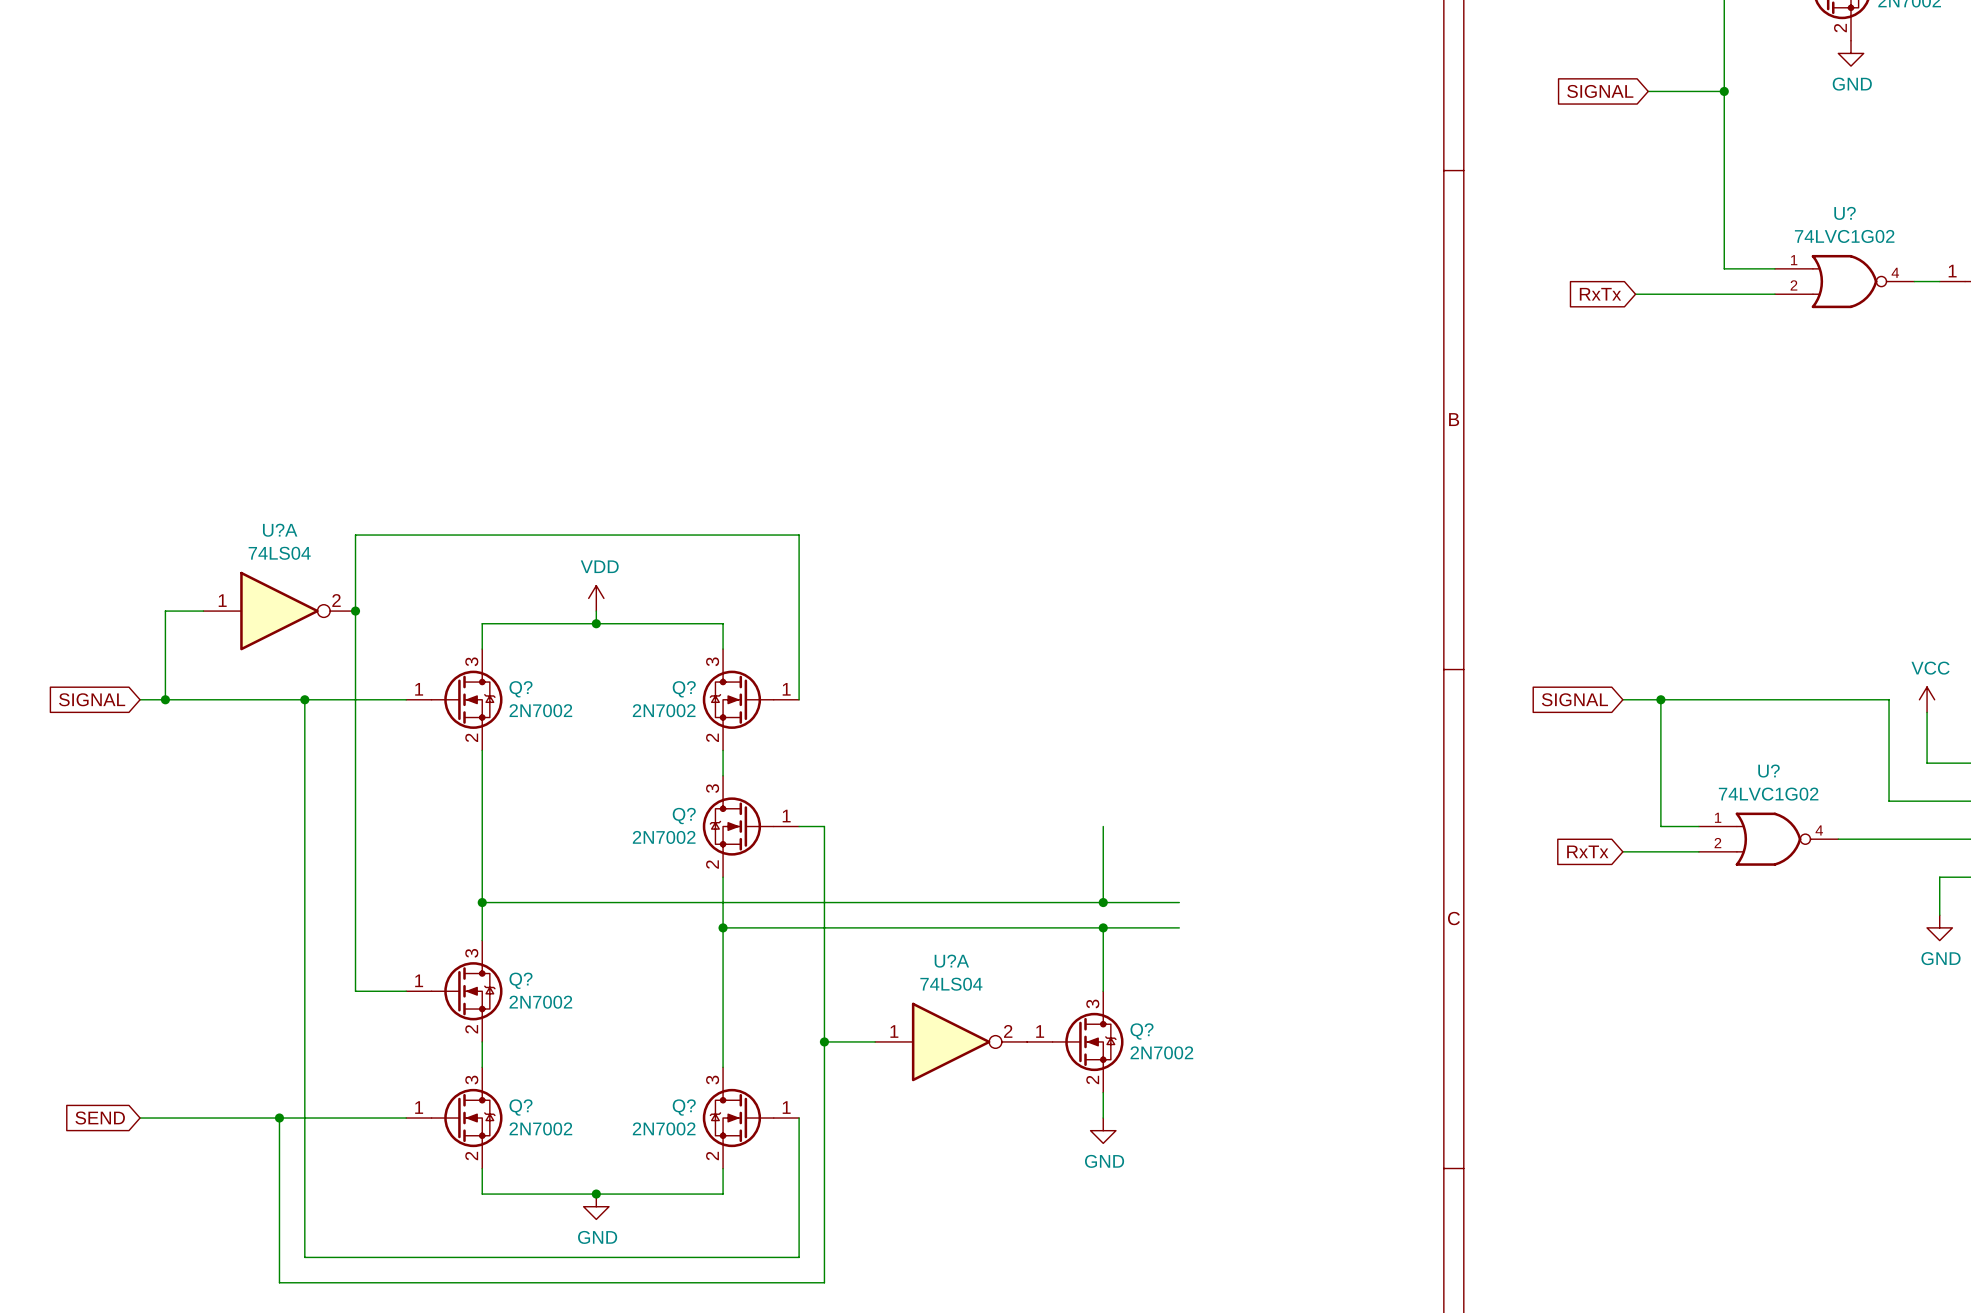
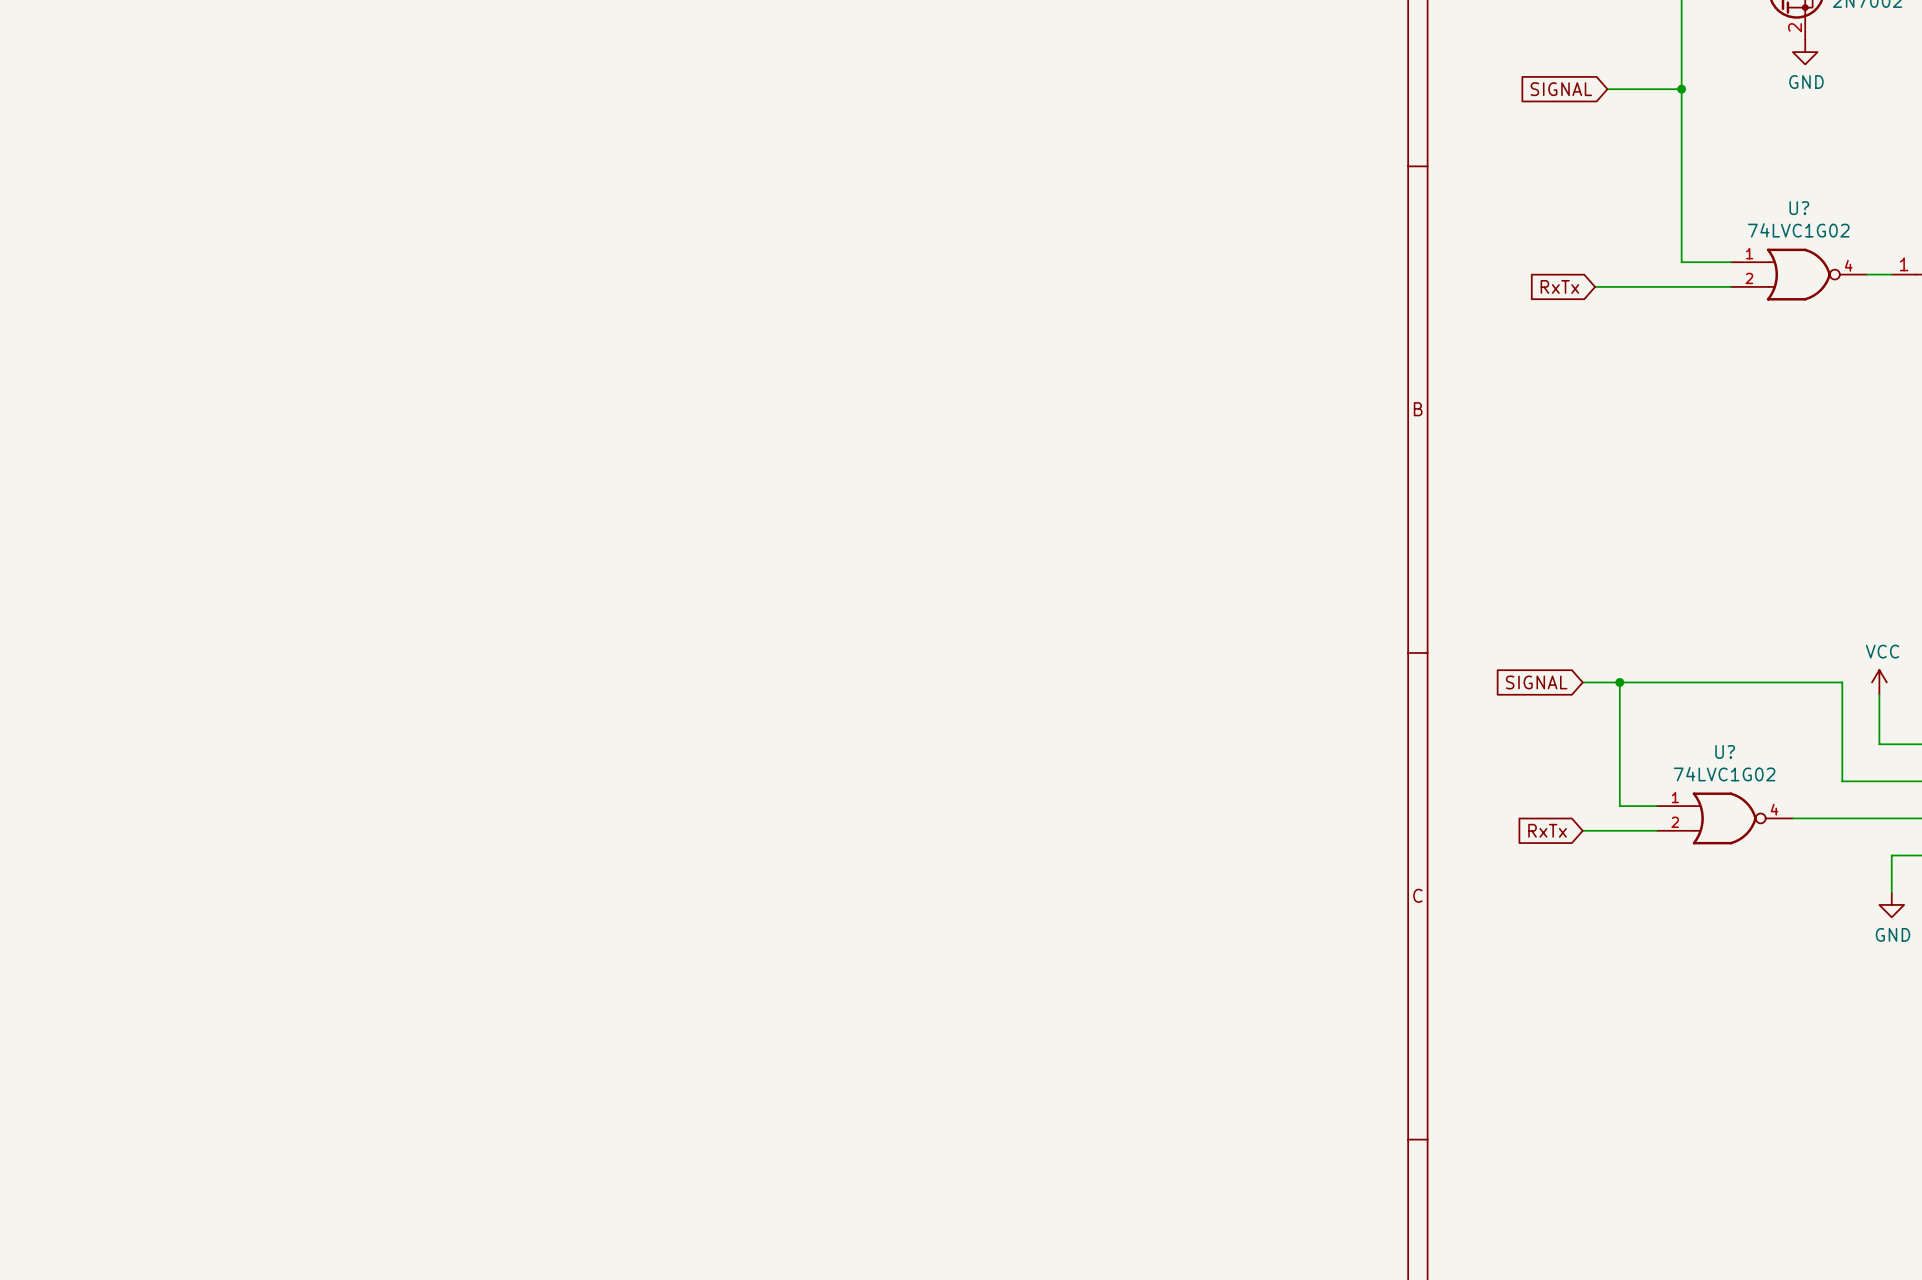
power symbol: VDD (596, 598) -> none
wire: (203, 611) (165, 611) (165, 699) -> none
U?A: 74LS04 (279, 611) -> none
junction: (355, 611) -> none
wire: (596, 611) (596, 623) -> none
junction: (596, 623) -> none
wire: (482, 649) (482, 623) (723, 623) (723, 649) -> none
global label: SIGNAL (92, 699) -> none
wire: (140, 699) (406, 699) -> none
junction: (165, 699) -> none
wire: (304, 699) (304, 1257) (799, 1257) (799, 1118) -> none
junction: (304, 699) -> none
Q?: 2N7002 (454, 699) -> none
Q?: 2N7002 (750, 699) -> none
wire: (799, 699) (799, 535) (355, 535) (355, 991) (406, 991) -> none
wire: (482, 750) (482, 940) -> none
wire: (723, 750) (723, 775) -> none
Q?: 2N7002 (750, 826) -> none
wire: (799, 826) (824, 826) (824, 1282) (279, 1282) (279, 1118) -> none
wire: (1103, 826) (1103, 902) -> none
wire: (723, 877) (723, 1067) -> none
wire: (482, 902) (1179, 902) -> none
junction: (482, 902) -> none
junction: (1103, 902) -> none
wire: (723, 927) (1179, 927) -> none
junction: (723, 927) -> none
wire: (1103, 927) (1103, 991) -> none
junction: (1103, 927) -> none
Q?: 2N7002 (454, 991) -> none
wire: (482, 1041) (482, 1067) -> none
wire: (824, 1041) (875, 1041) -> none
junction: (824, 1041) -> none
U?A: 74LS04 (951, 1041) -> none
Q?: 2N7002 (1075, 1041) -> none
wire: (1103, 1092) (1103, 1118) -> none
global label: SEND (100, 1118) -> none
wire: (140, 1118) (406, 1118) -> none
junction: (279, 1118) -> none
Q?: 2N7002 (454, 1118) -> none
Q?: 2N7002 (750, 1118) -> none
power symbol: GND (1103, 1130) -> none
wire: (482, 1168) (482, 1194) (723, 1194) (723, 1168) -> none
junction: (596, 1194) -> none
power symbol: GND (596, 1206) -> none

